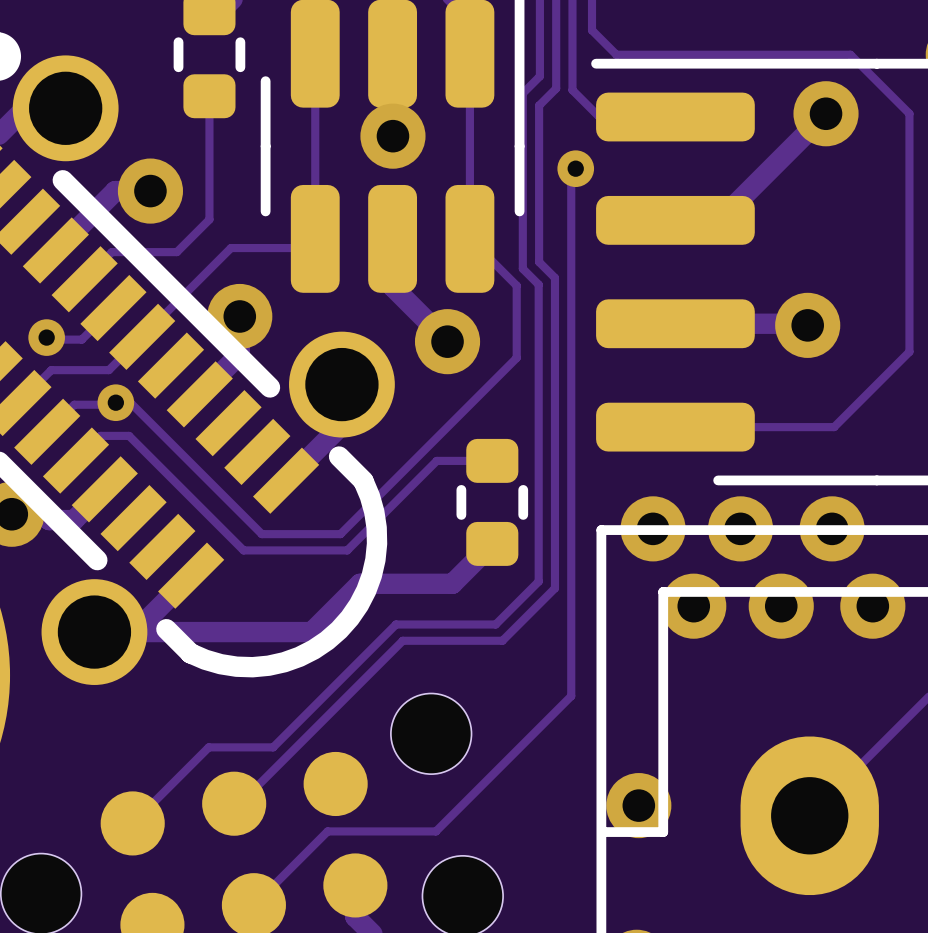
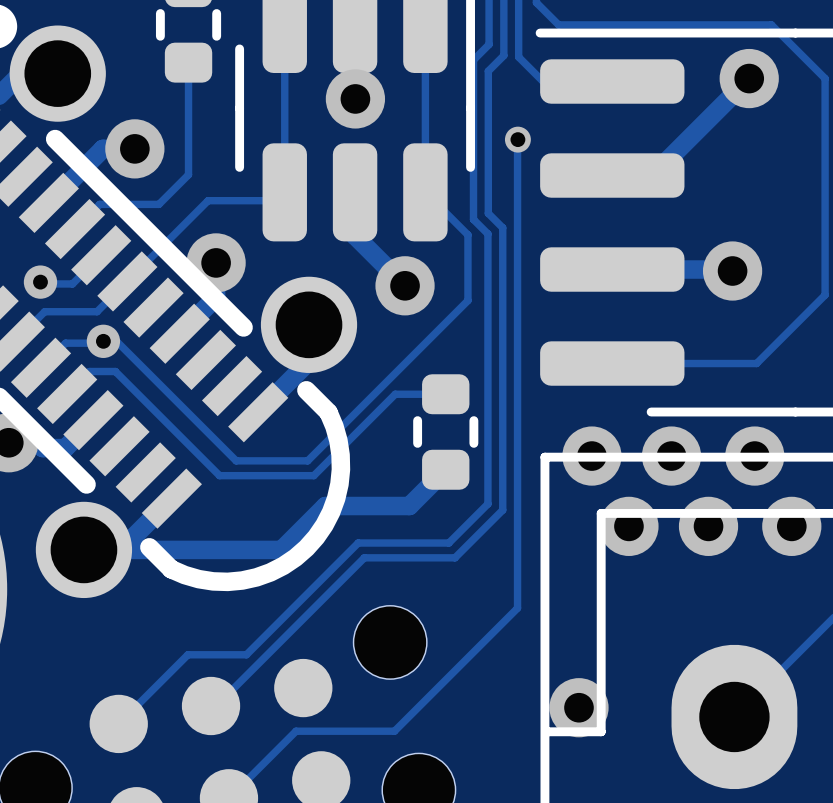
via size: [557, 150, 595, 188] -> [504, 126, 531, 153]

